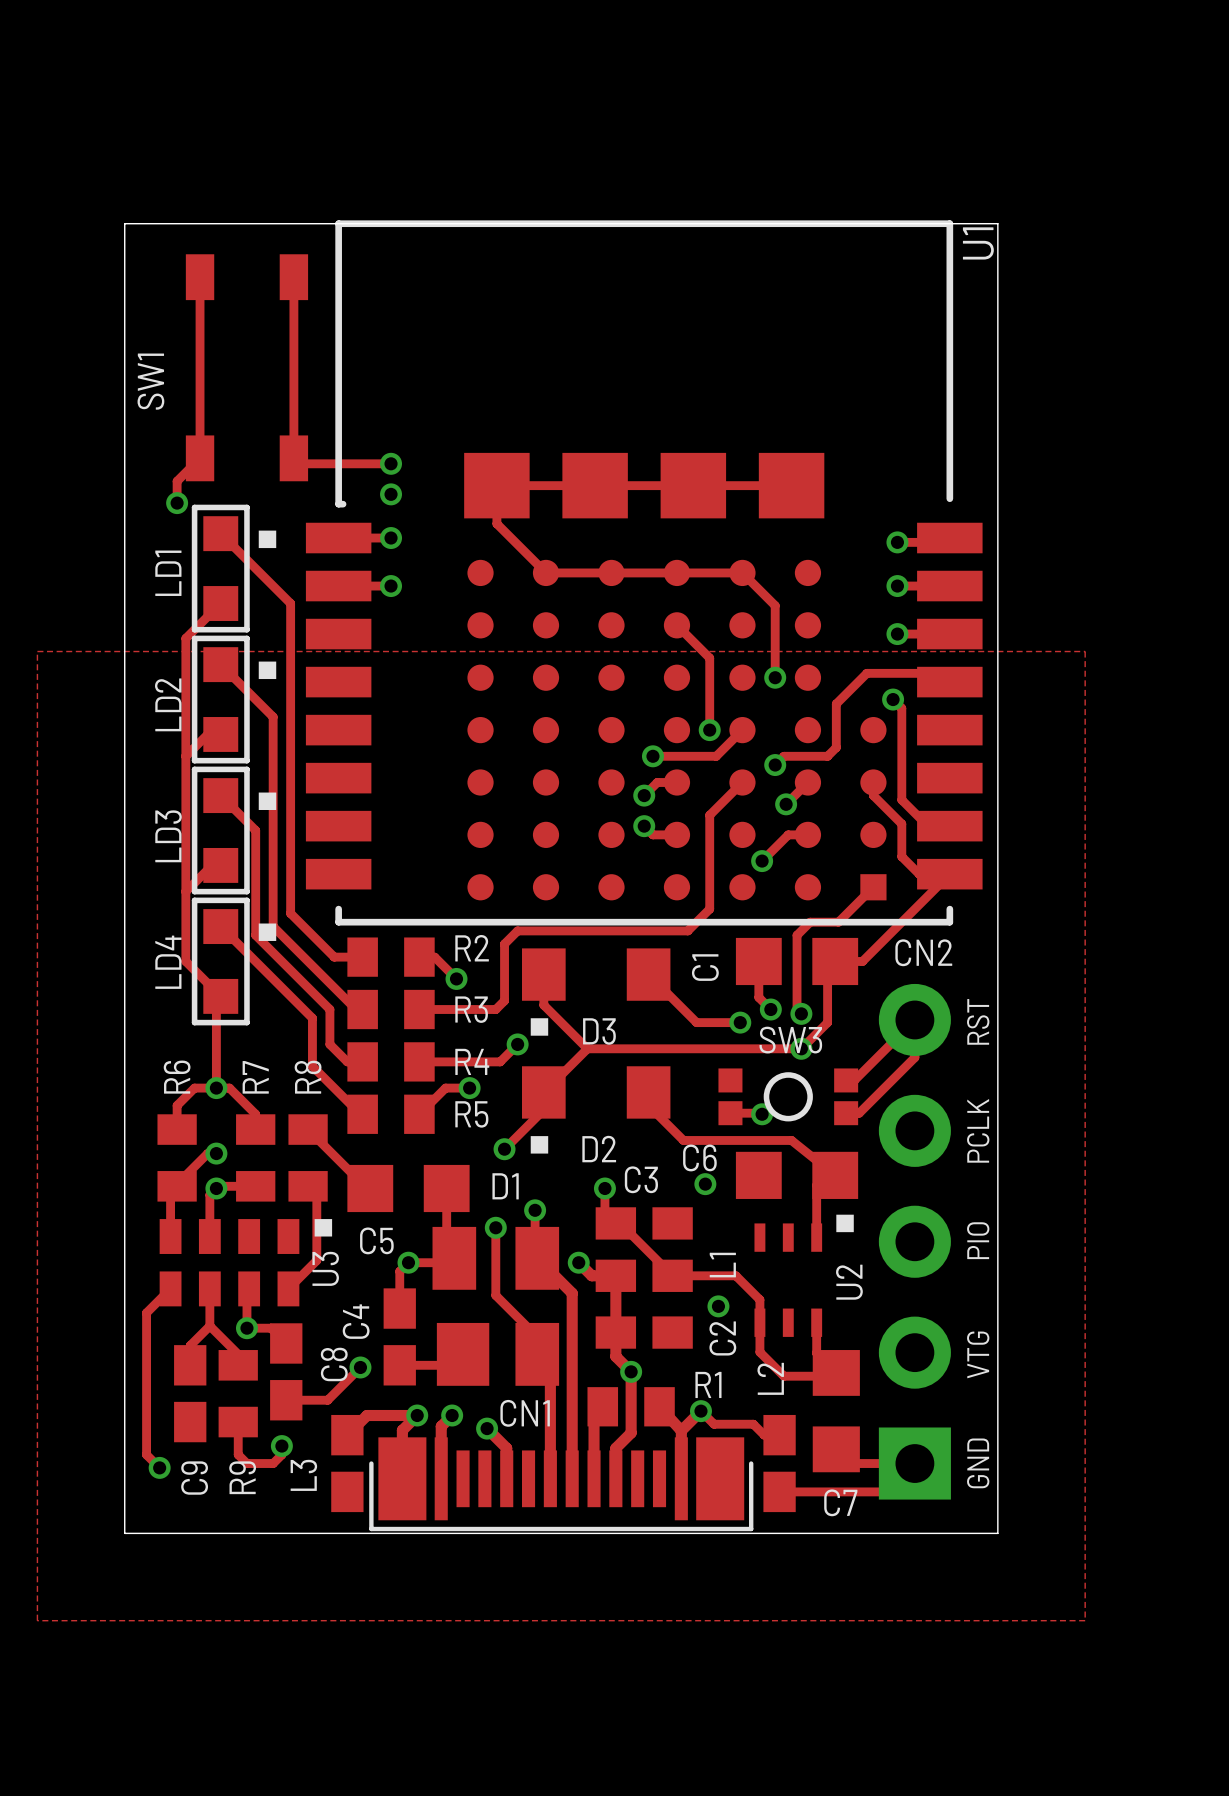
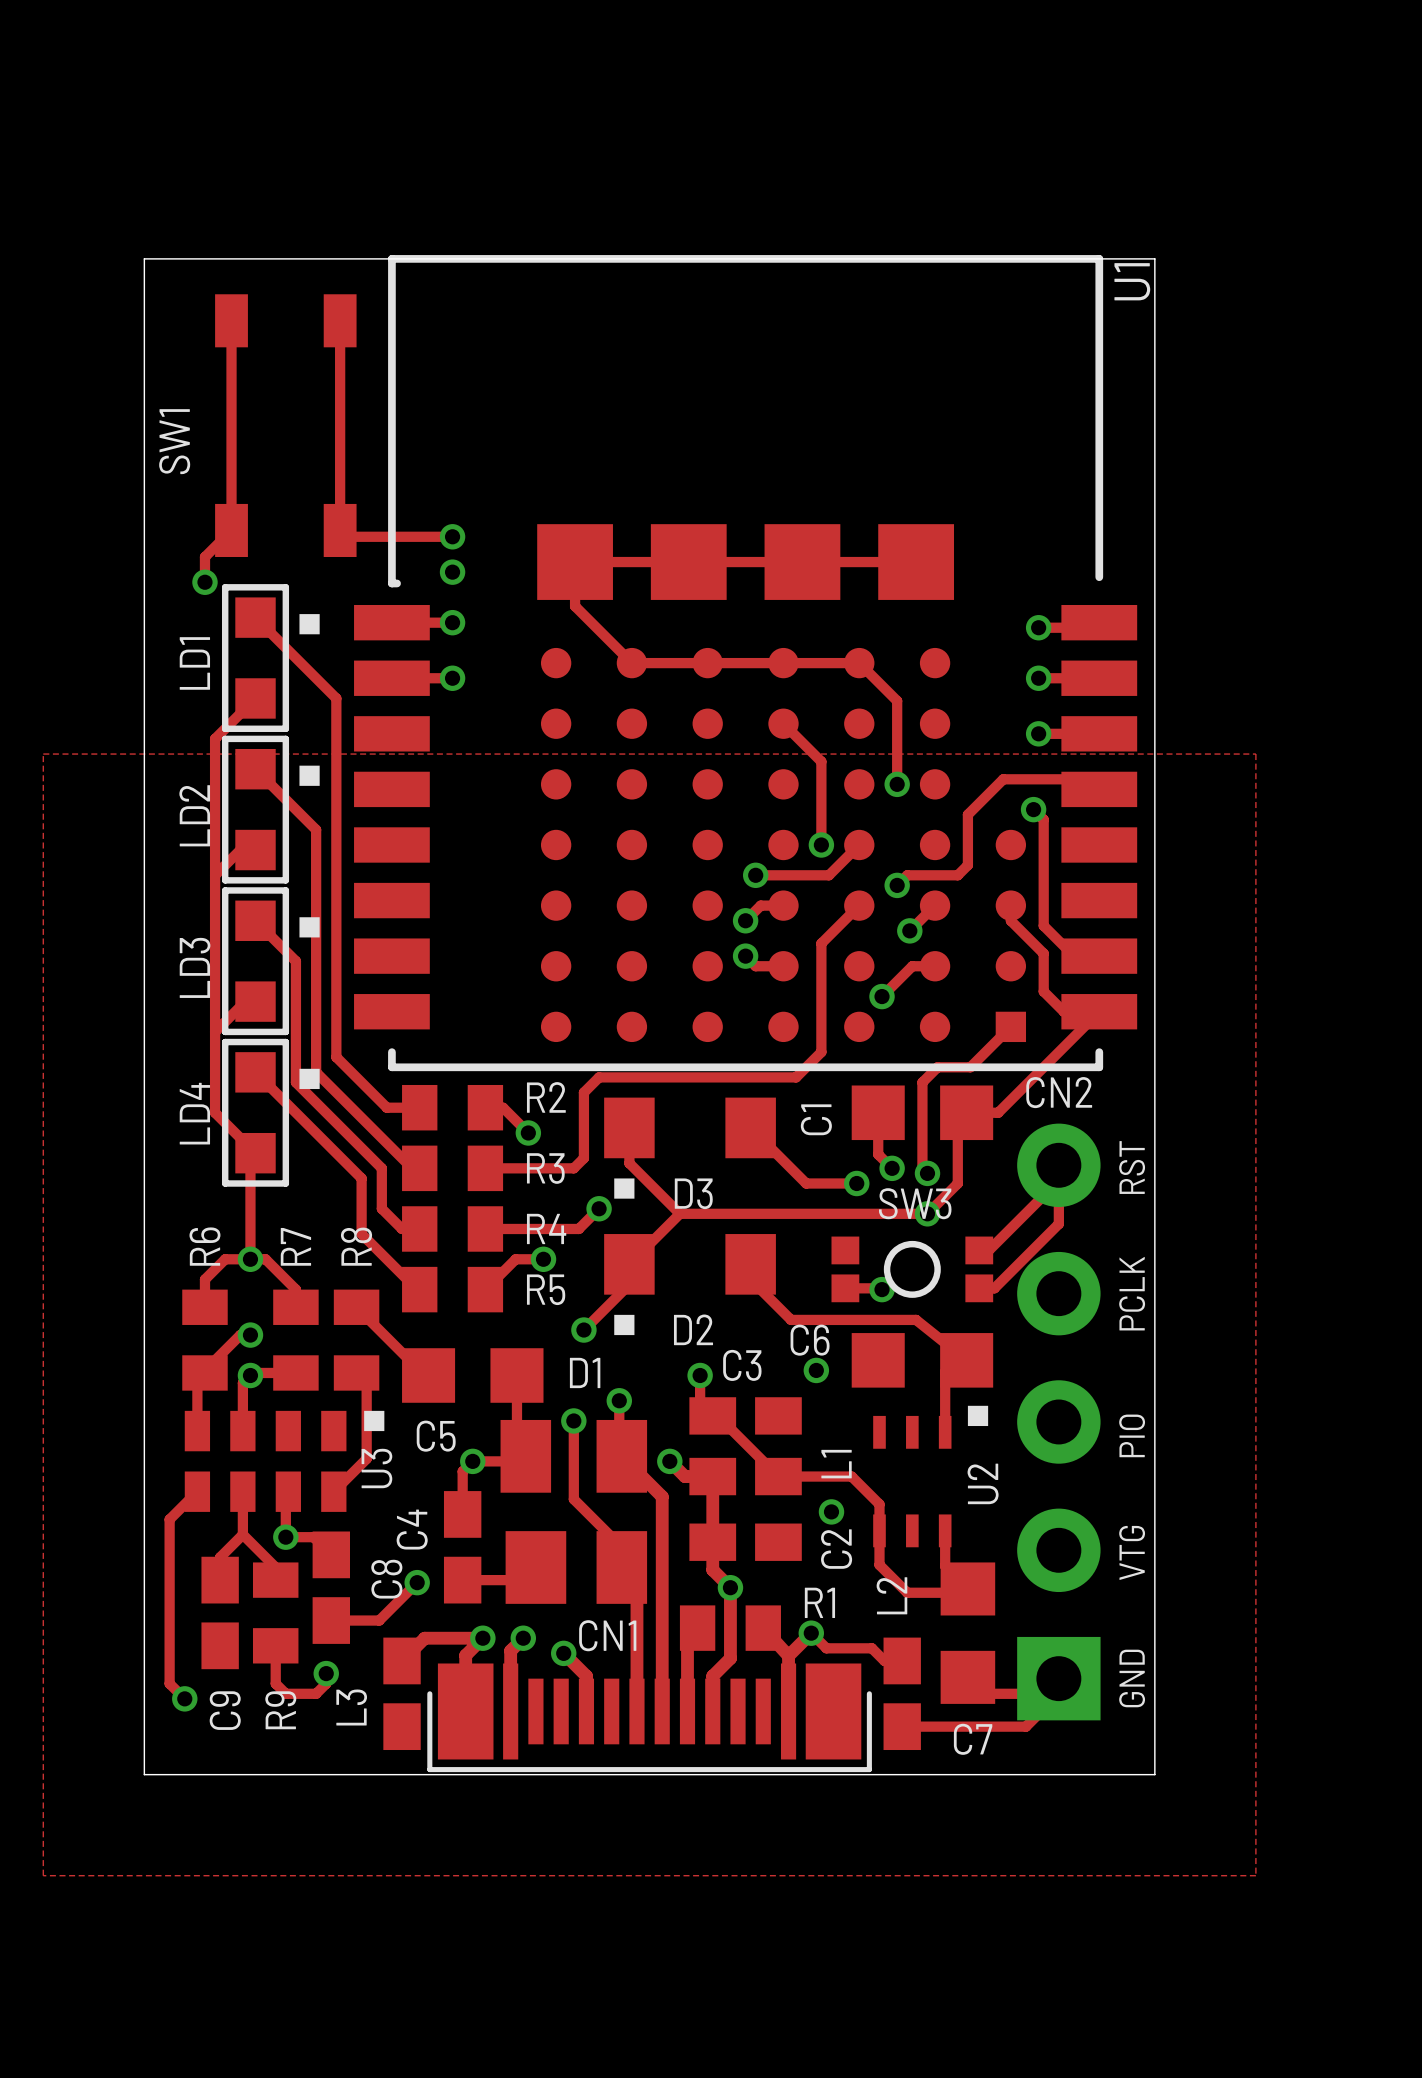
CN2 name position: CN2 (923, 952) -> CN2 (1059, 1092)
text position: RST (978, 1021) -> RST (1132, 1167)
text position: PCLK (978, 1130) -> PCLK (1132, 1293)
CN2 position: (914, 1241) -> (1058, 1421)
text position: VTG (978, 1354) -> VTG (1132, 1552)
text position: GND (978, 1463) -> GND (1132, 1678)

